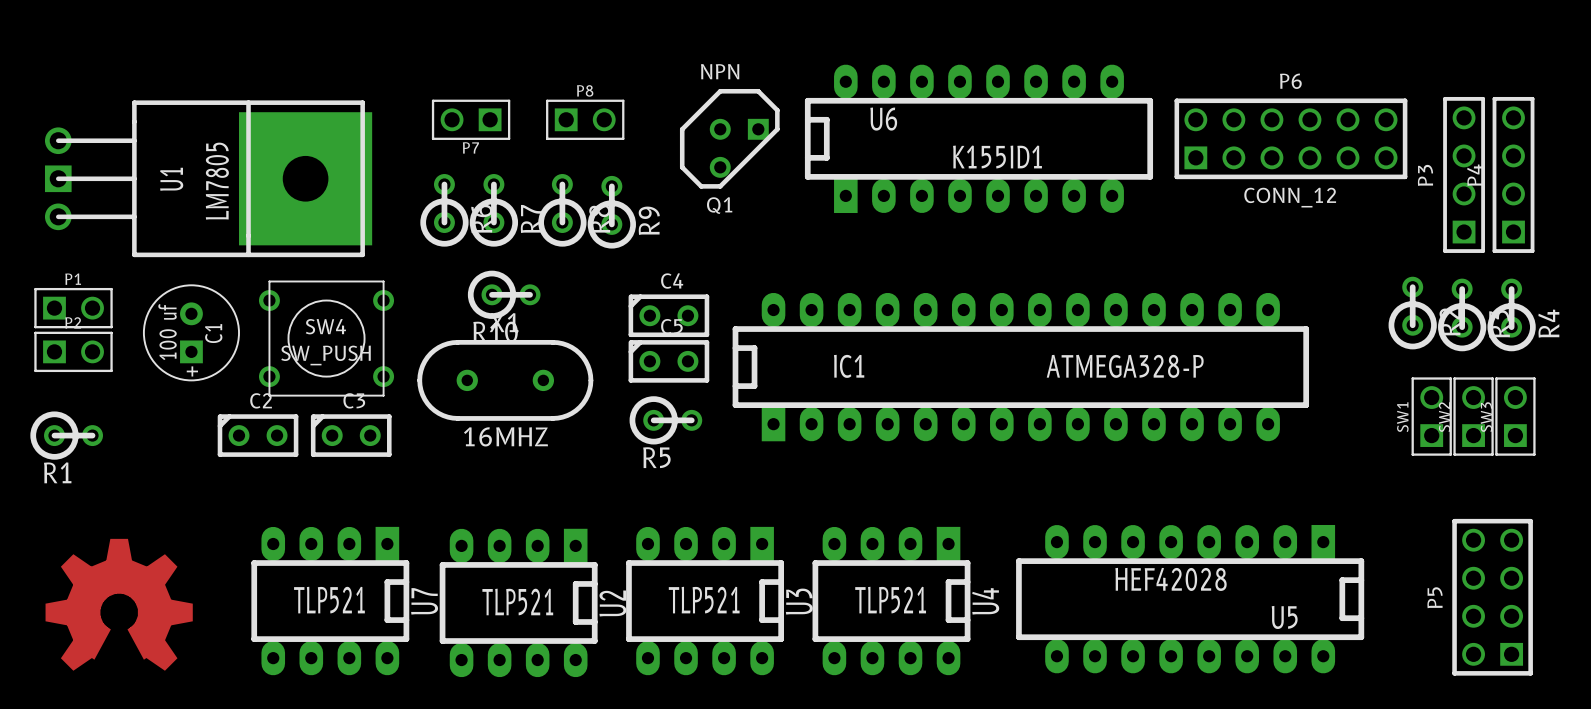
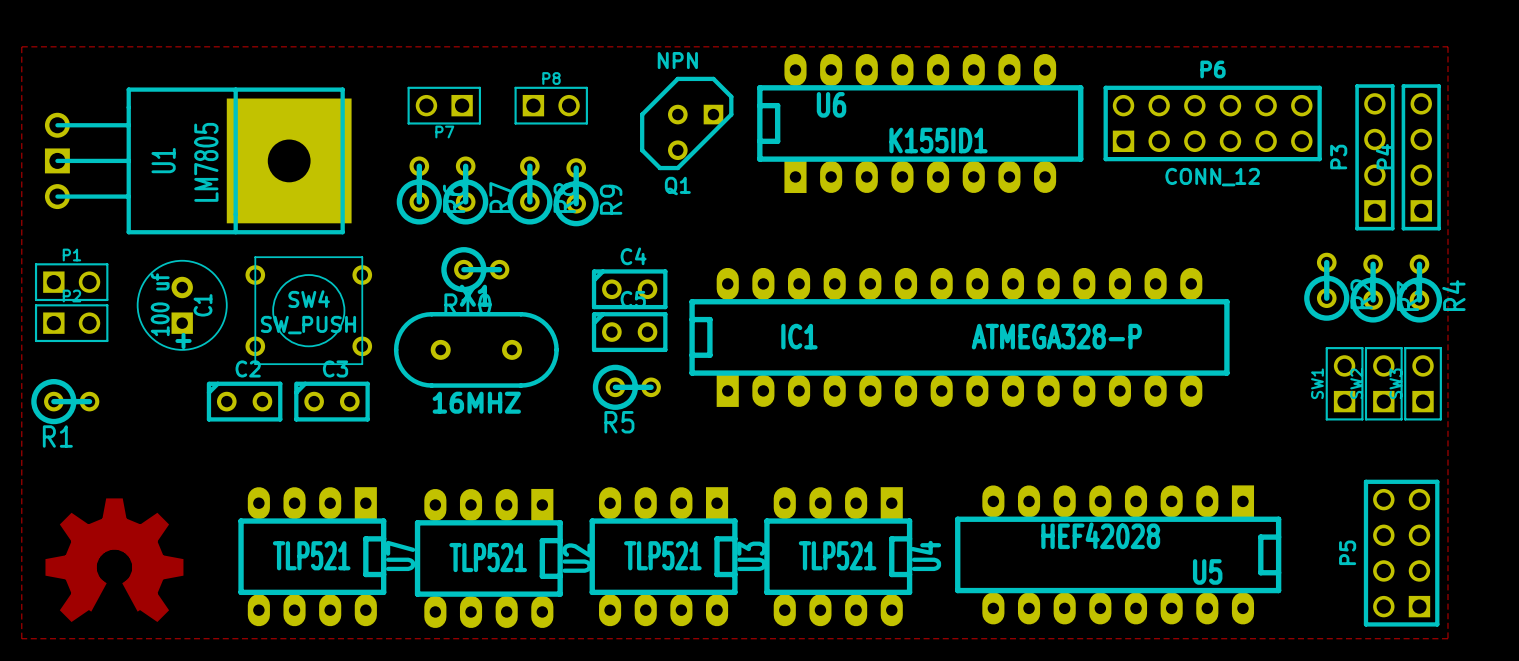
zone outline: none -> (21, 46) (21, 638) (1447, 638) (1447, 46) (21, 46)

